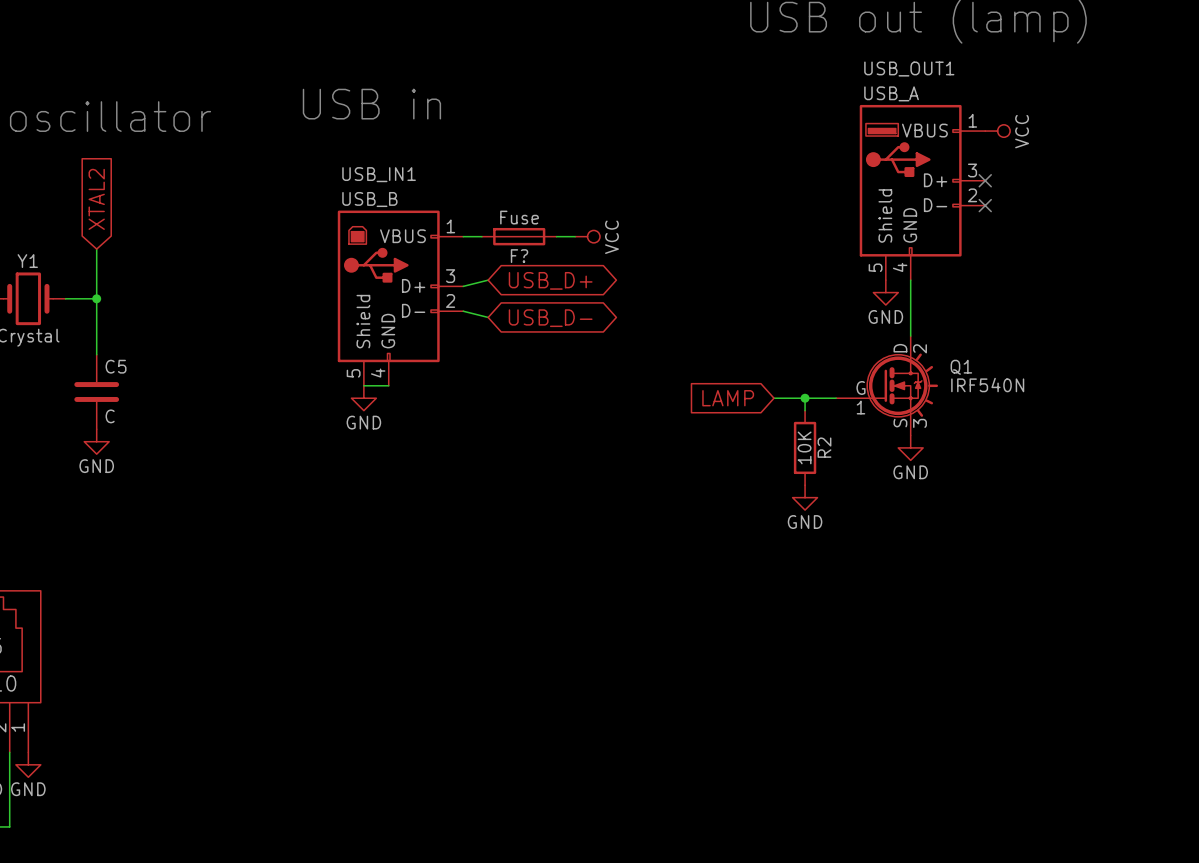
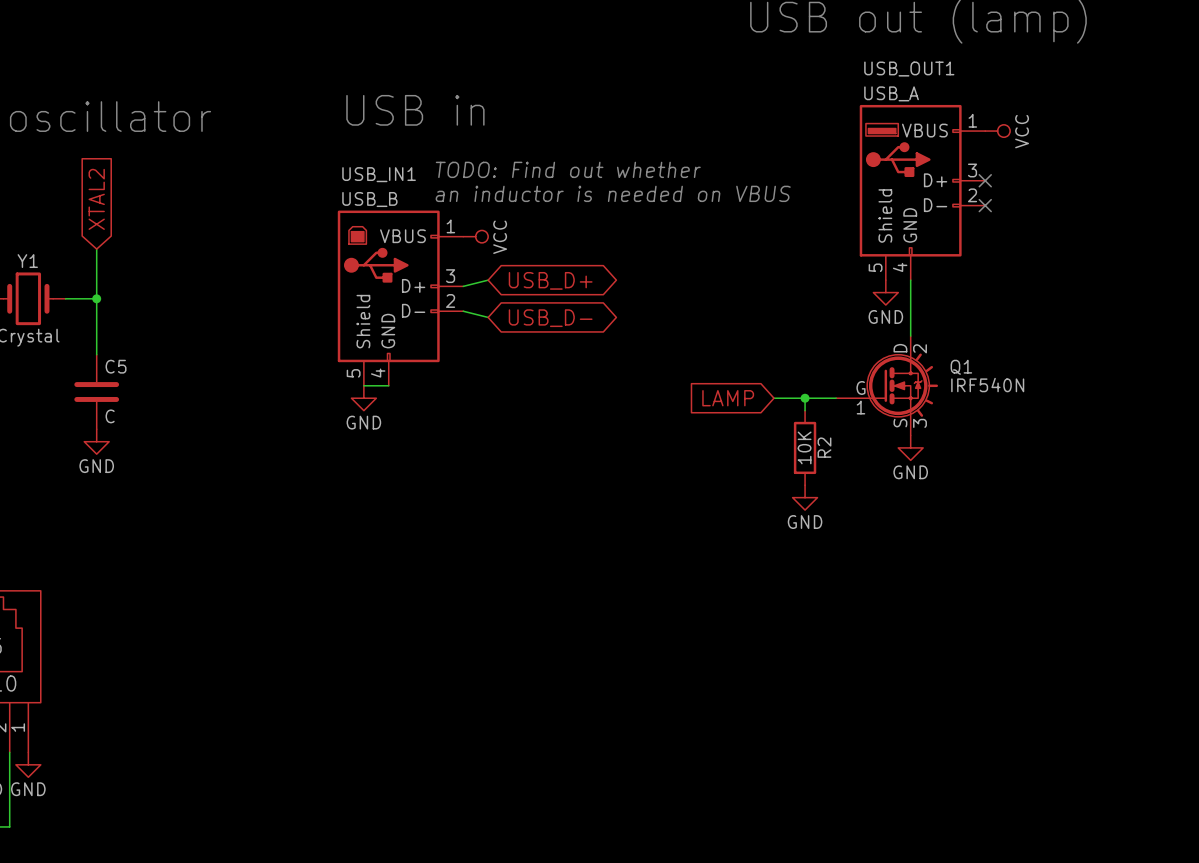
text position: USB in (371, 104) -> USB in (415, 110)
text: none -> TODO: Find out whether (568, 169)
text: none -> an inductor is needed on VBUS (613, 193)
F?: Fuse (519, 236) -> none
wire: (556, 236) (575, 236) -> none
power symbol position: VCC (587, 236) -> VCC (475, 236)

